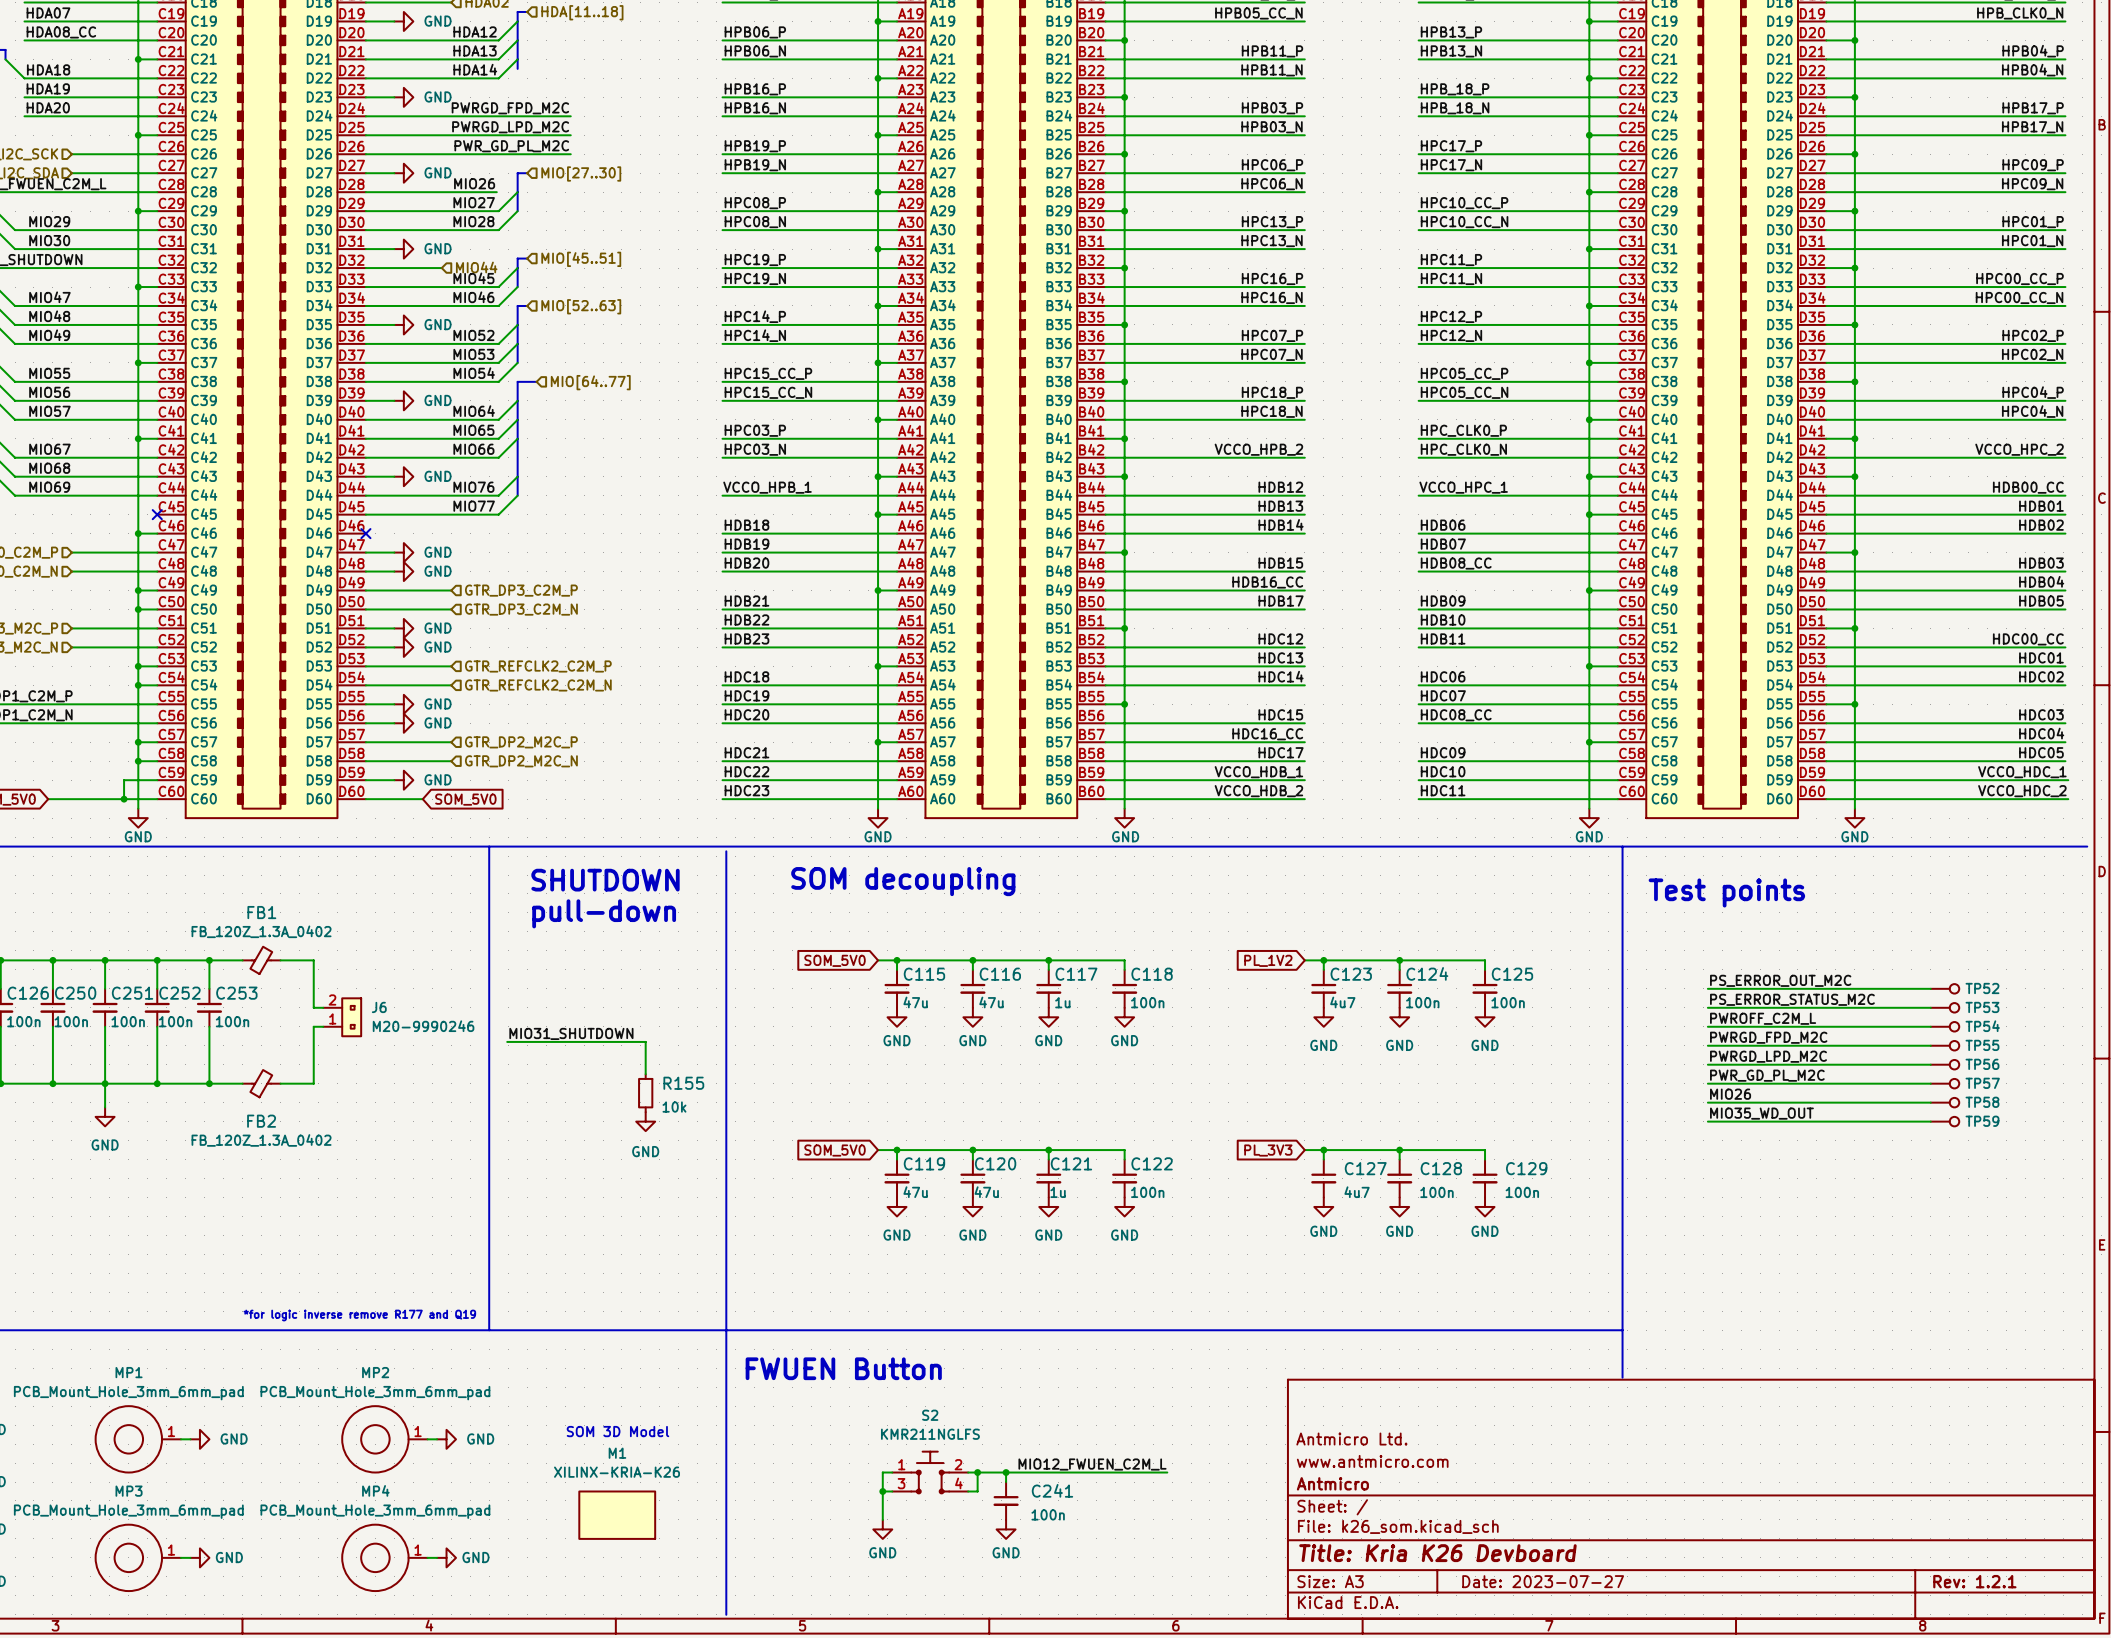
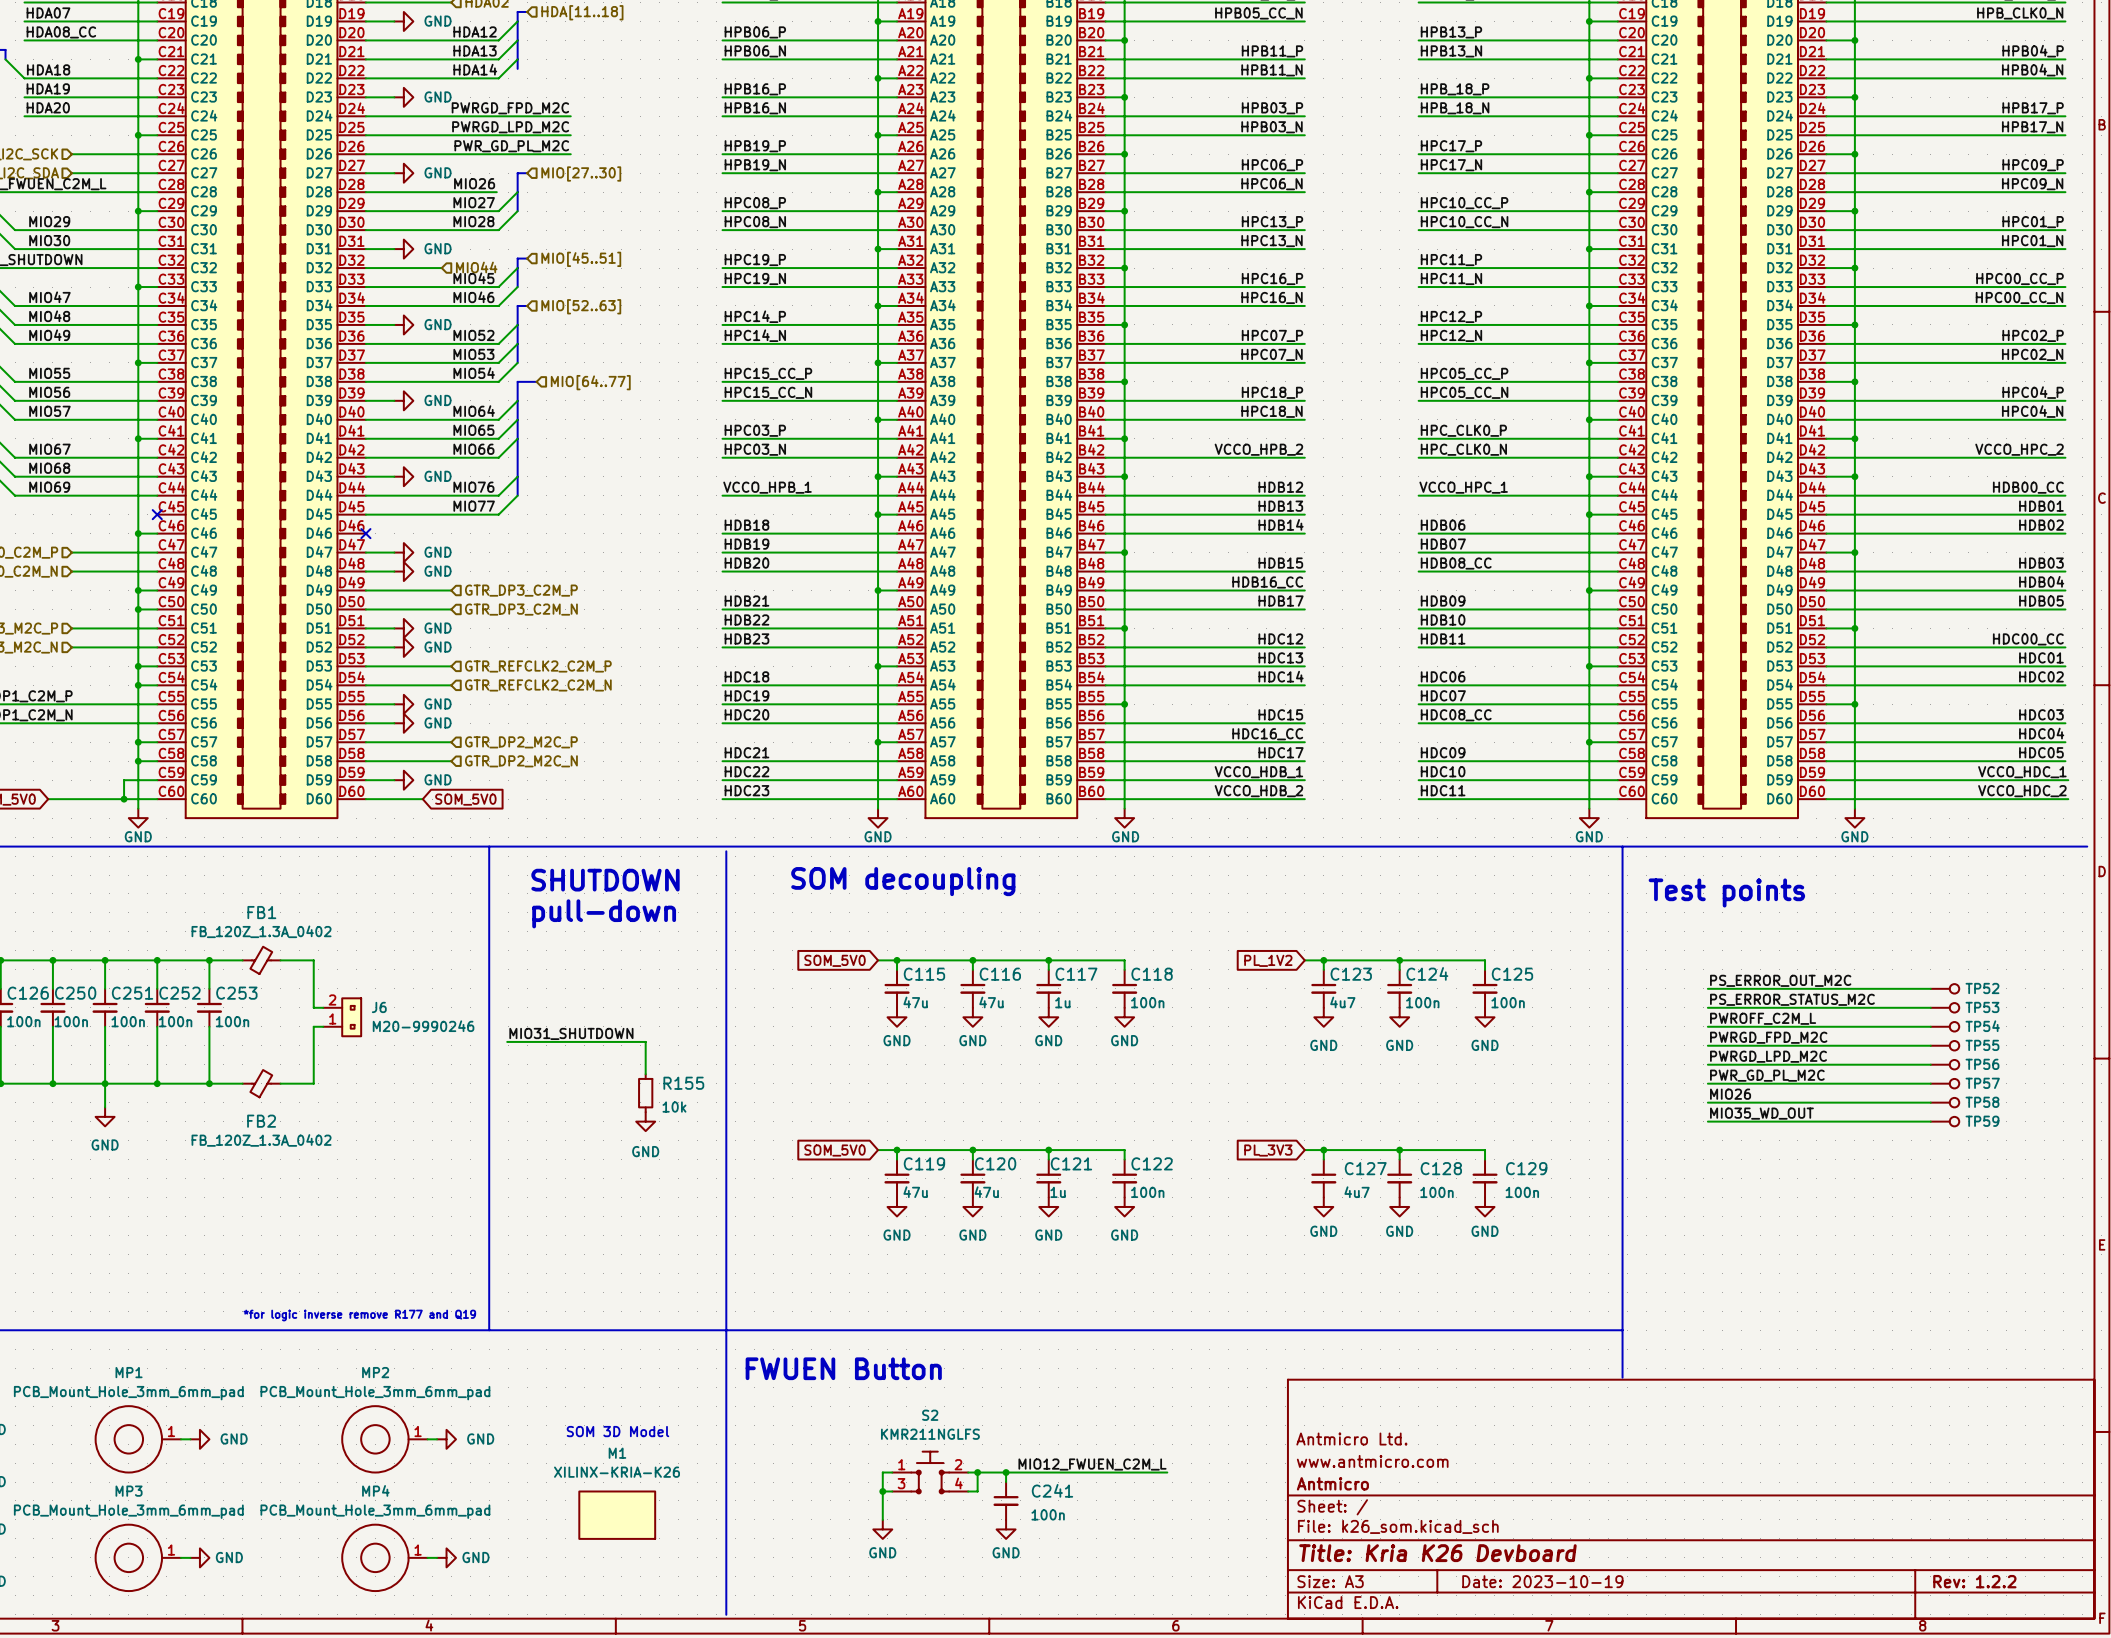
title block: Date: 2023-07-27 (1543, 1581) -> Date: 2023-10-19 (1542, 1581)
title block: Rev: 1.2.1 (1974, 1581) -> Rev: 1.2.2 (1974, 1581)

